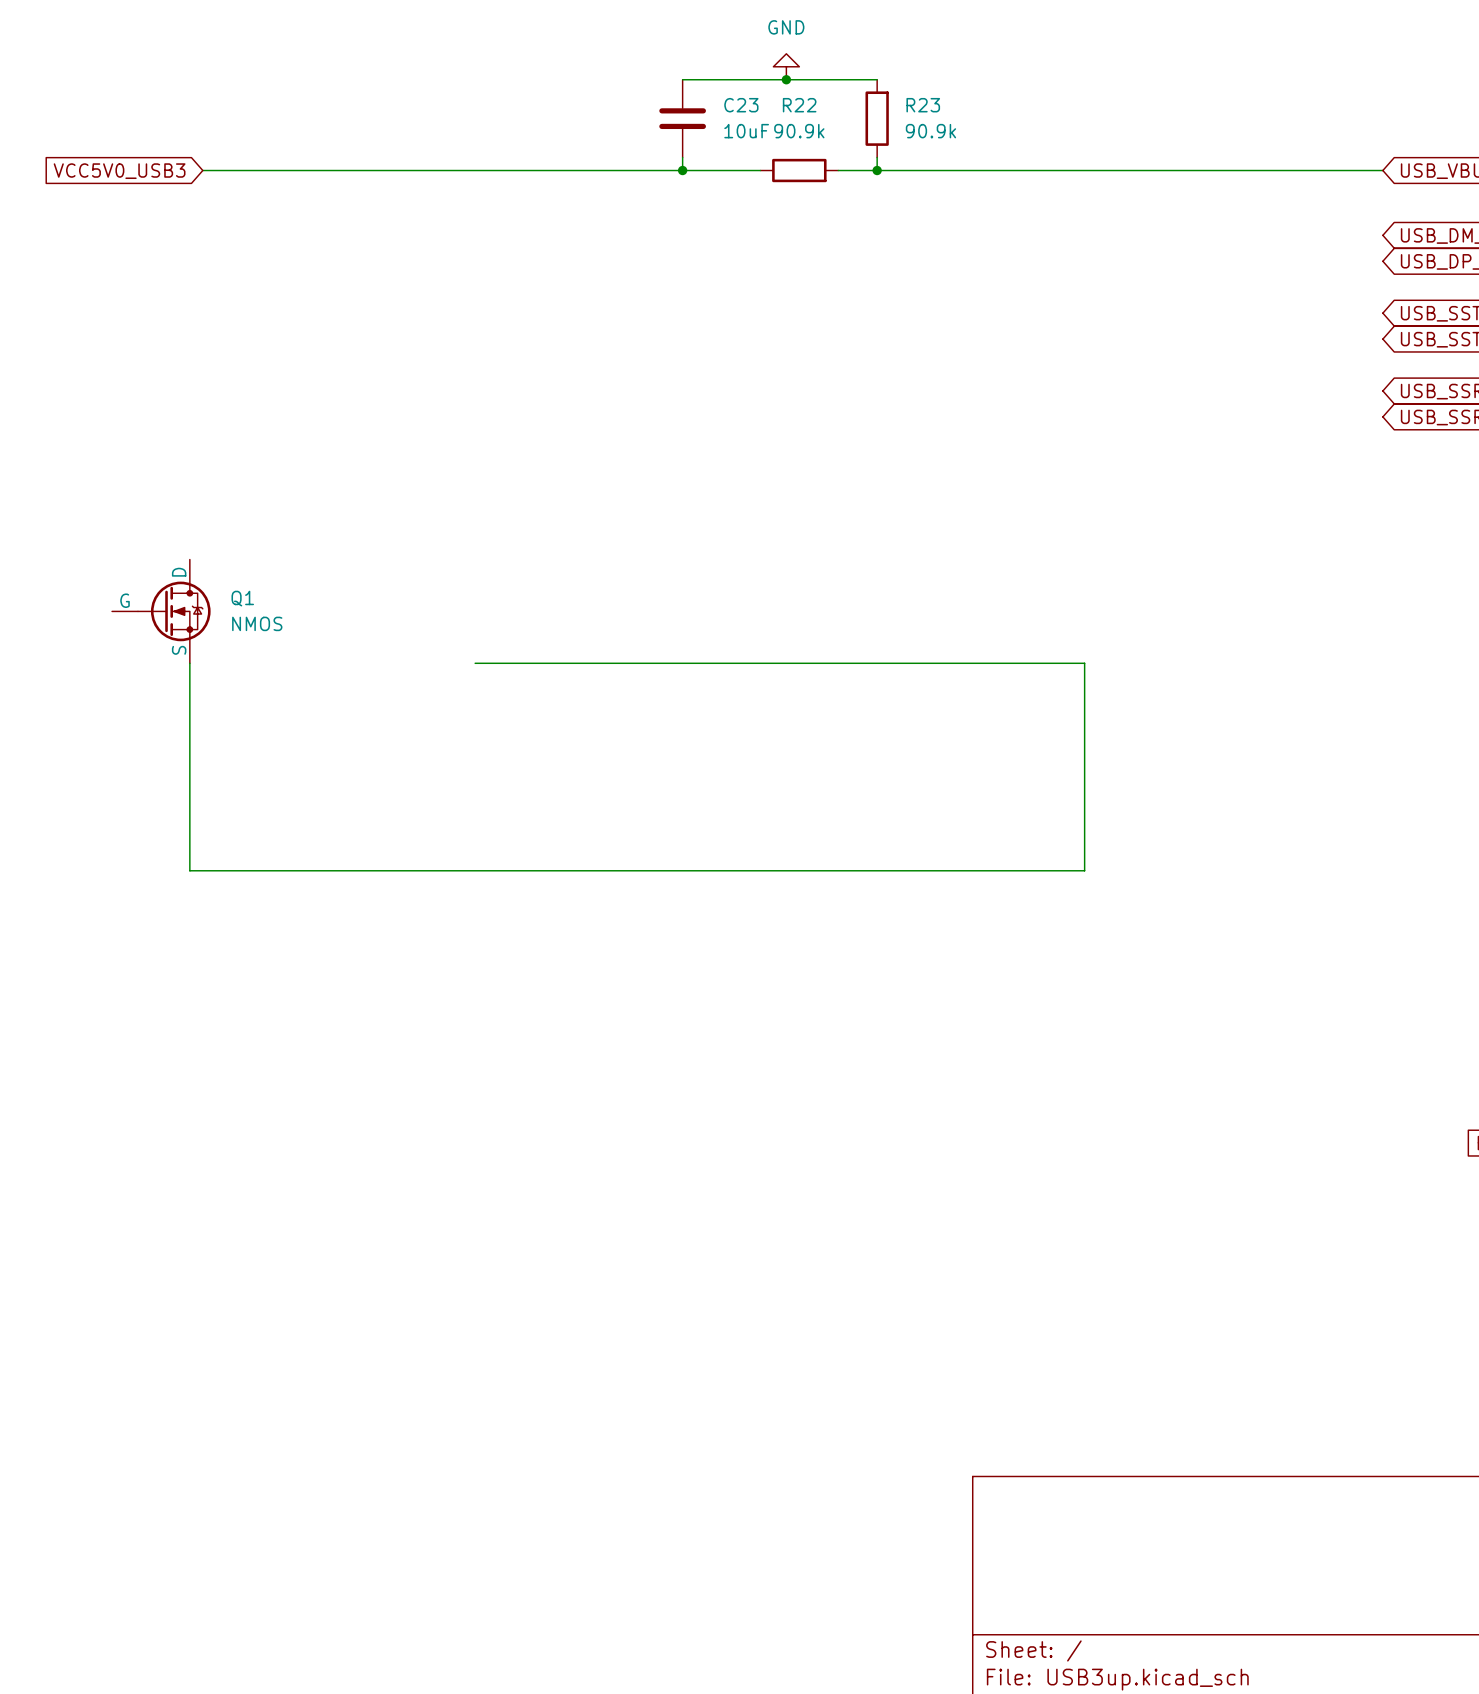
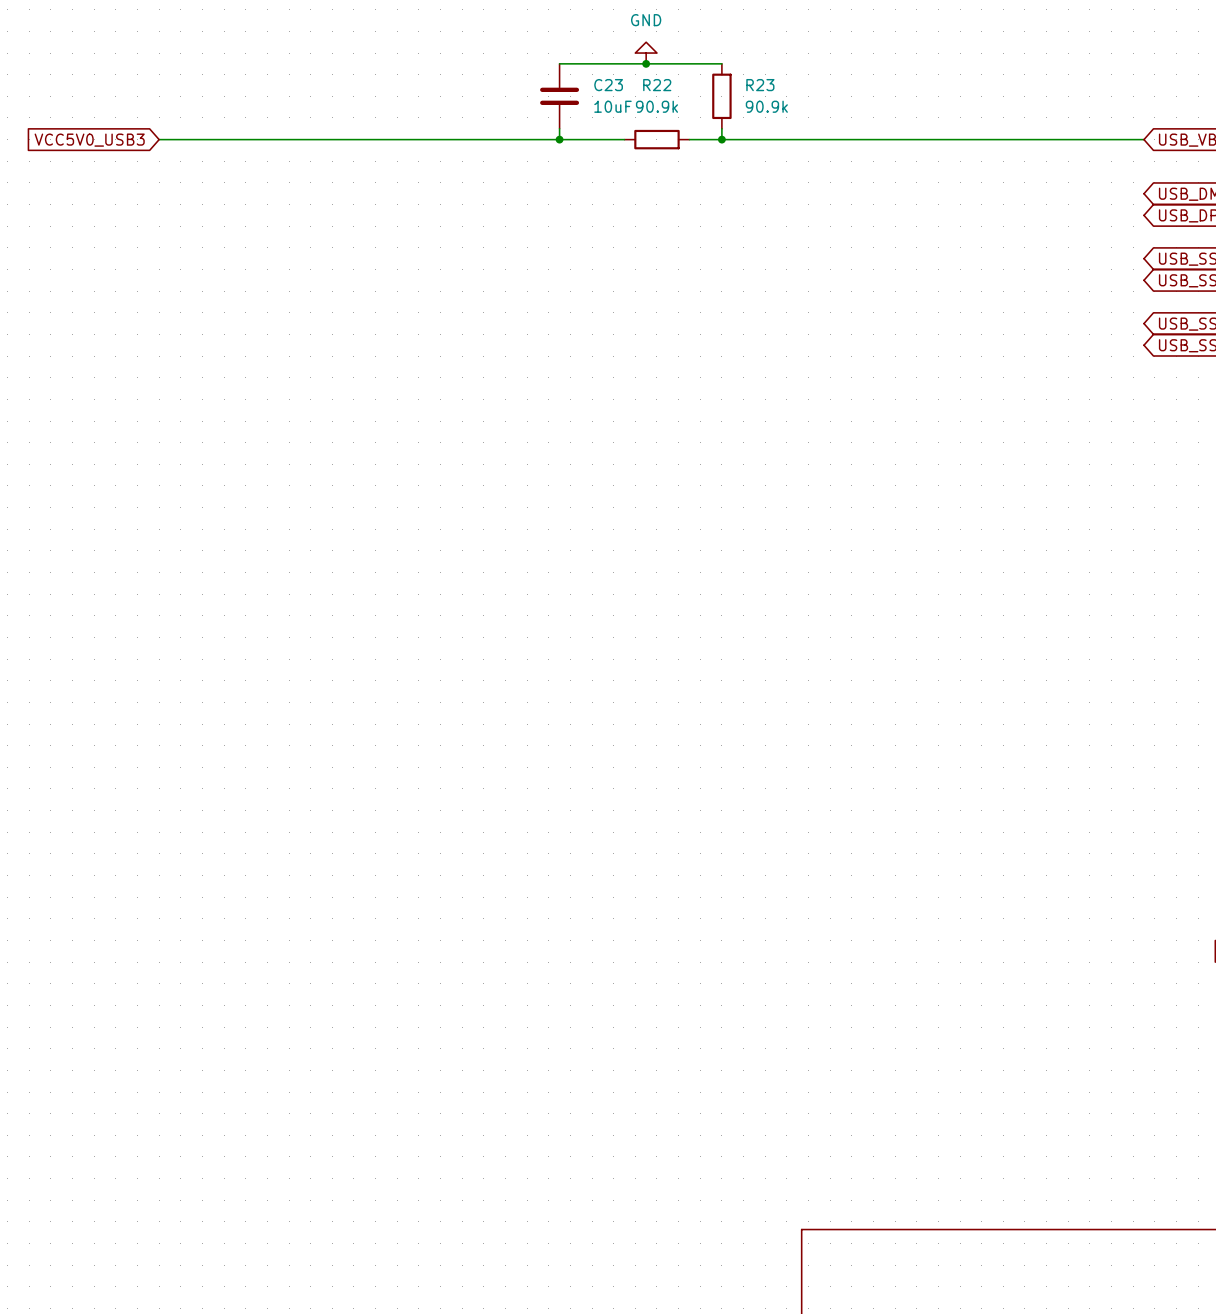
Q1: NMOS (161, 611) -> none
wire: (189, 663) (189, 870) (1084, 870) (1084, 663) (475, 663) -> none

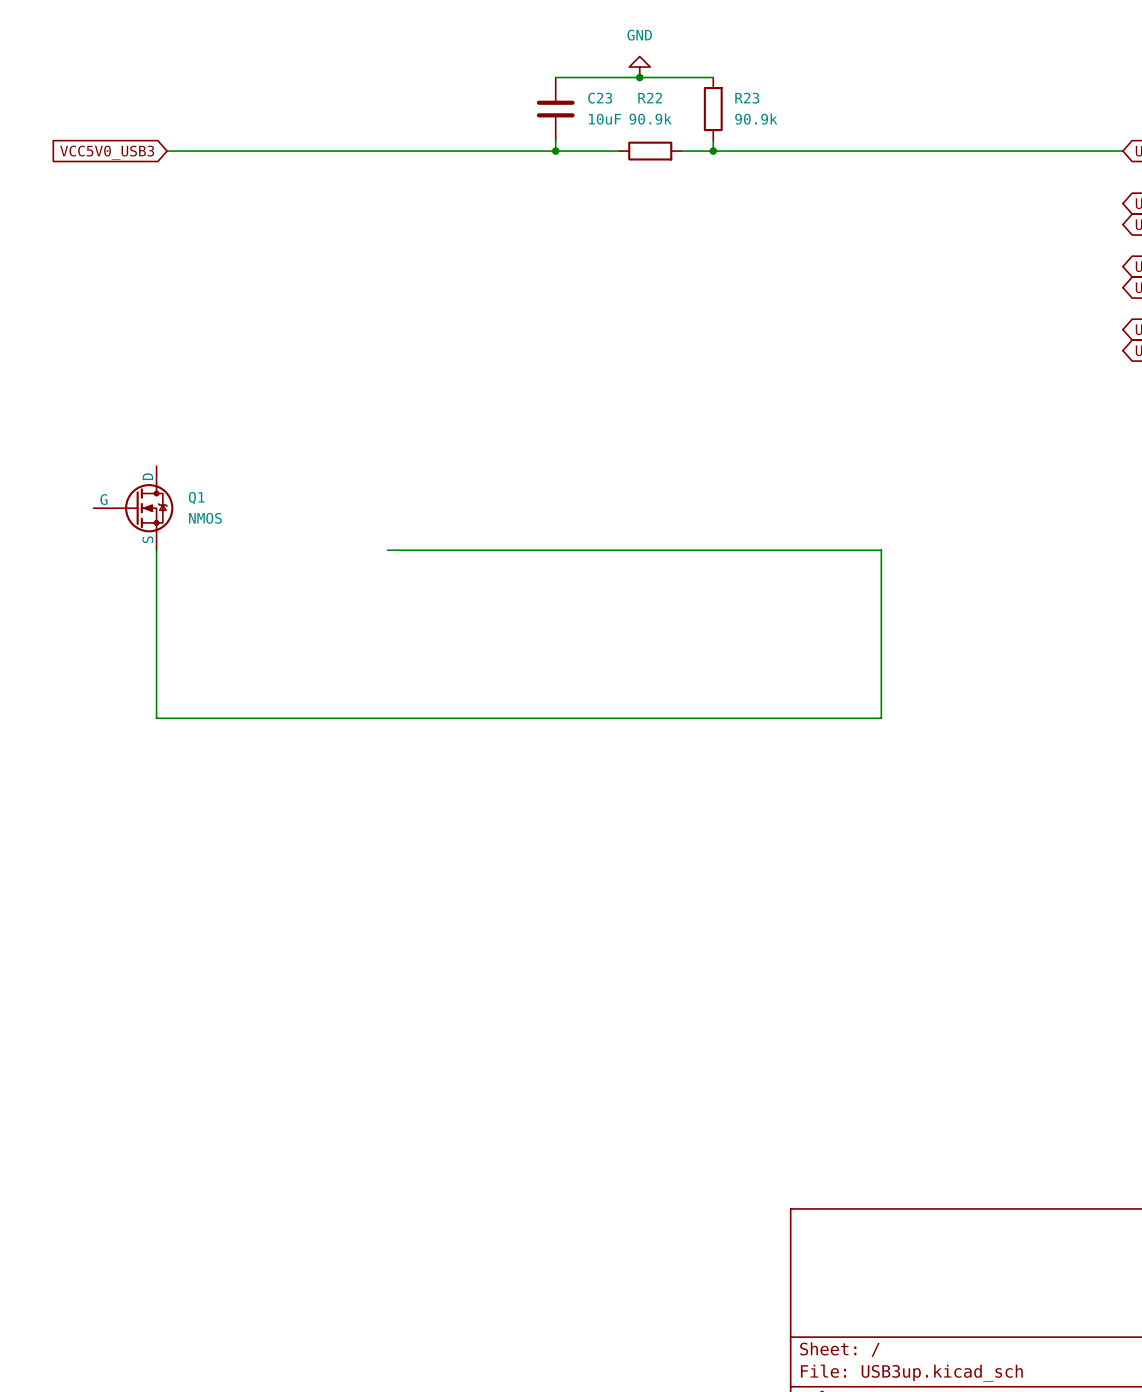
Q1: none -> NMOS (133, 508)
wire: none -> (156, 550) (156, 718) (881, 718) (881, 550) (387, 550)

